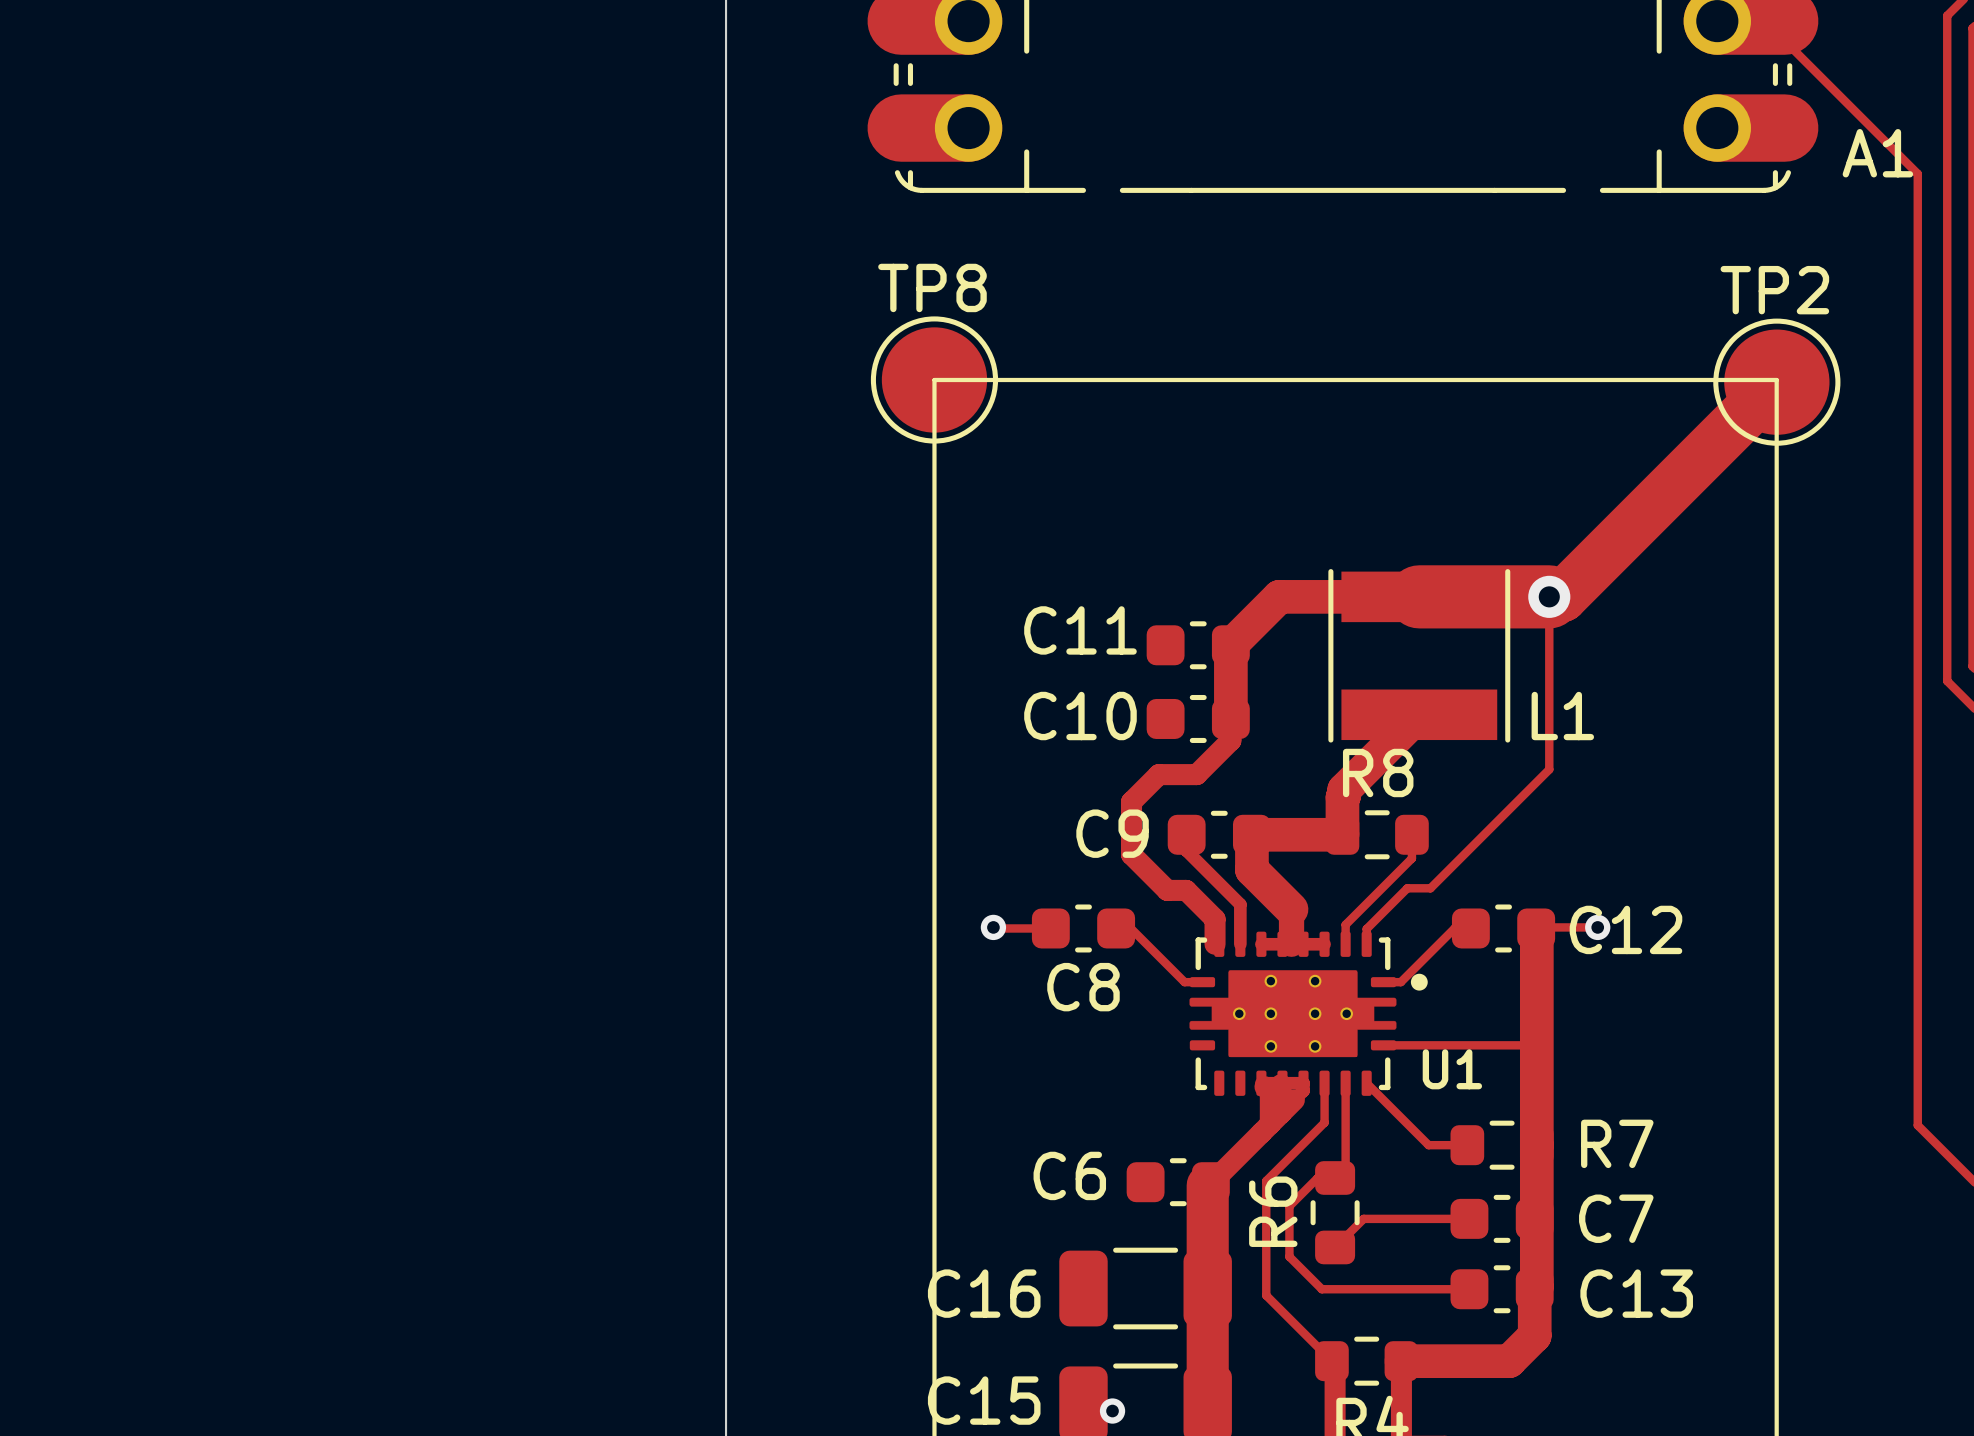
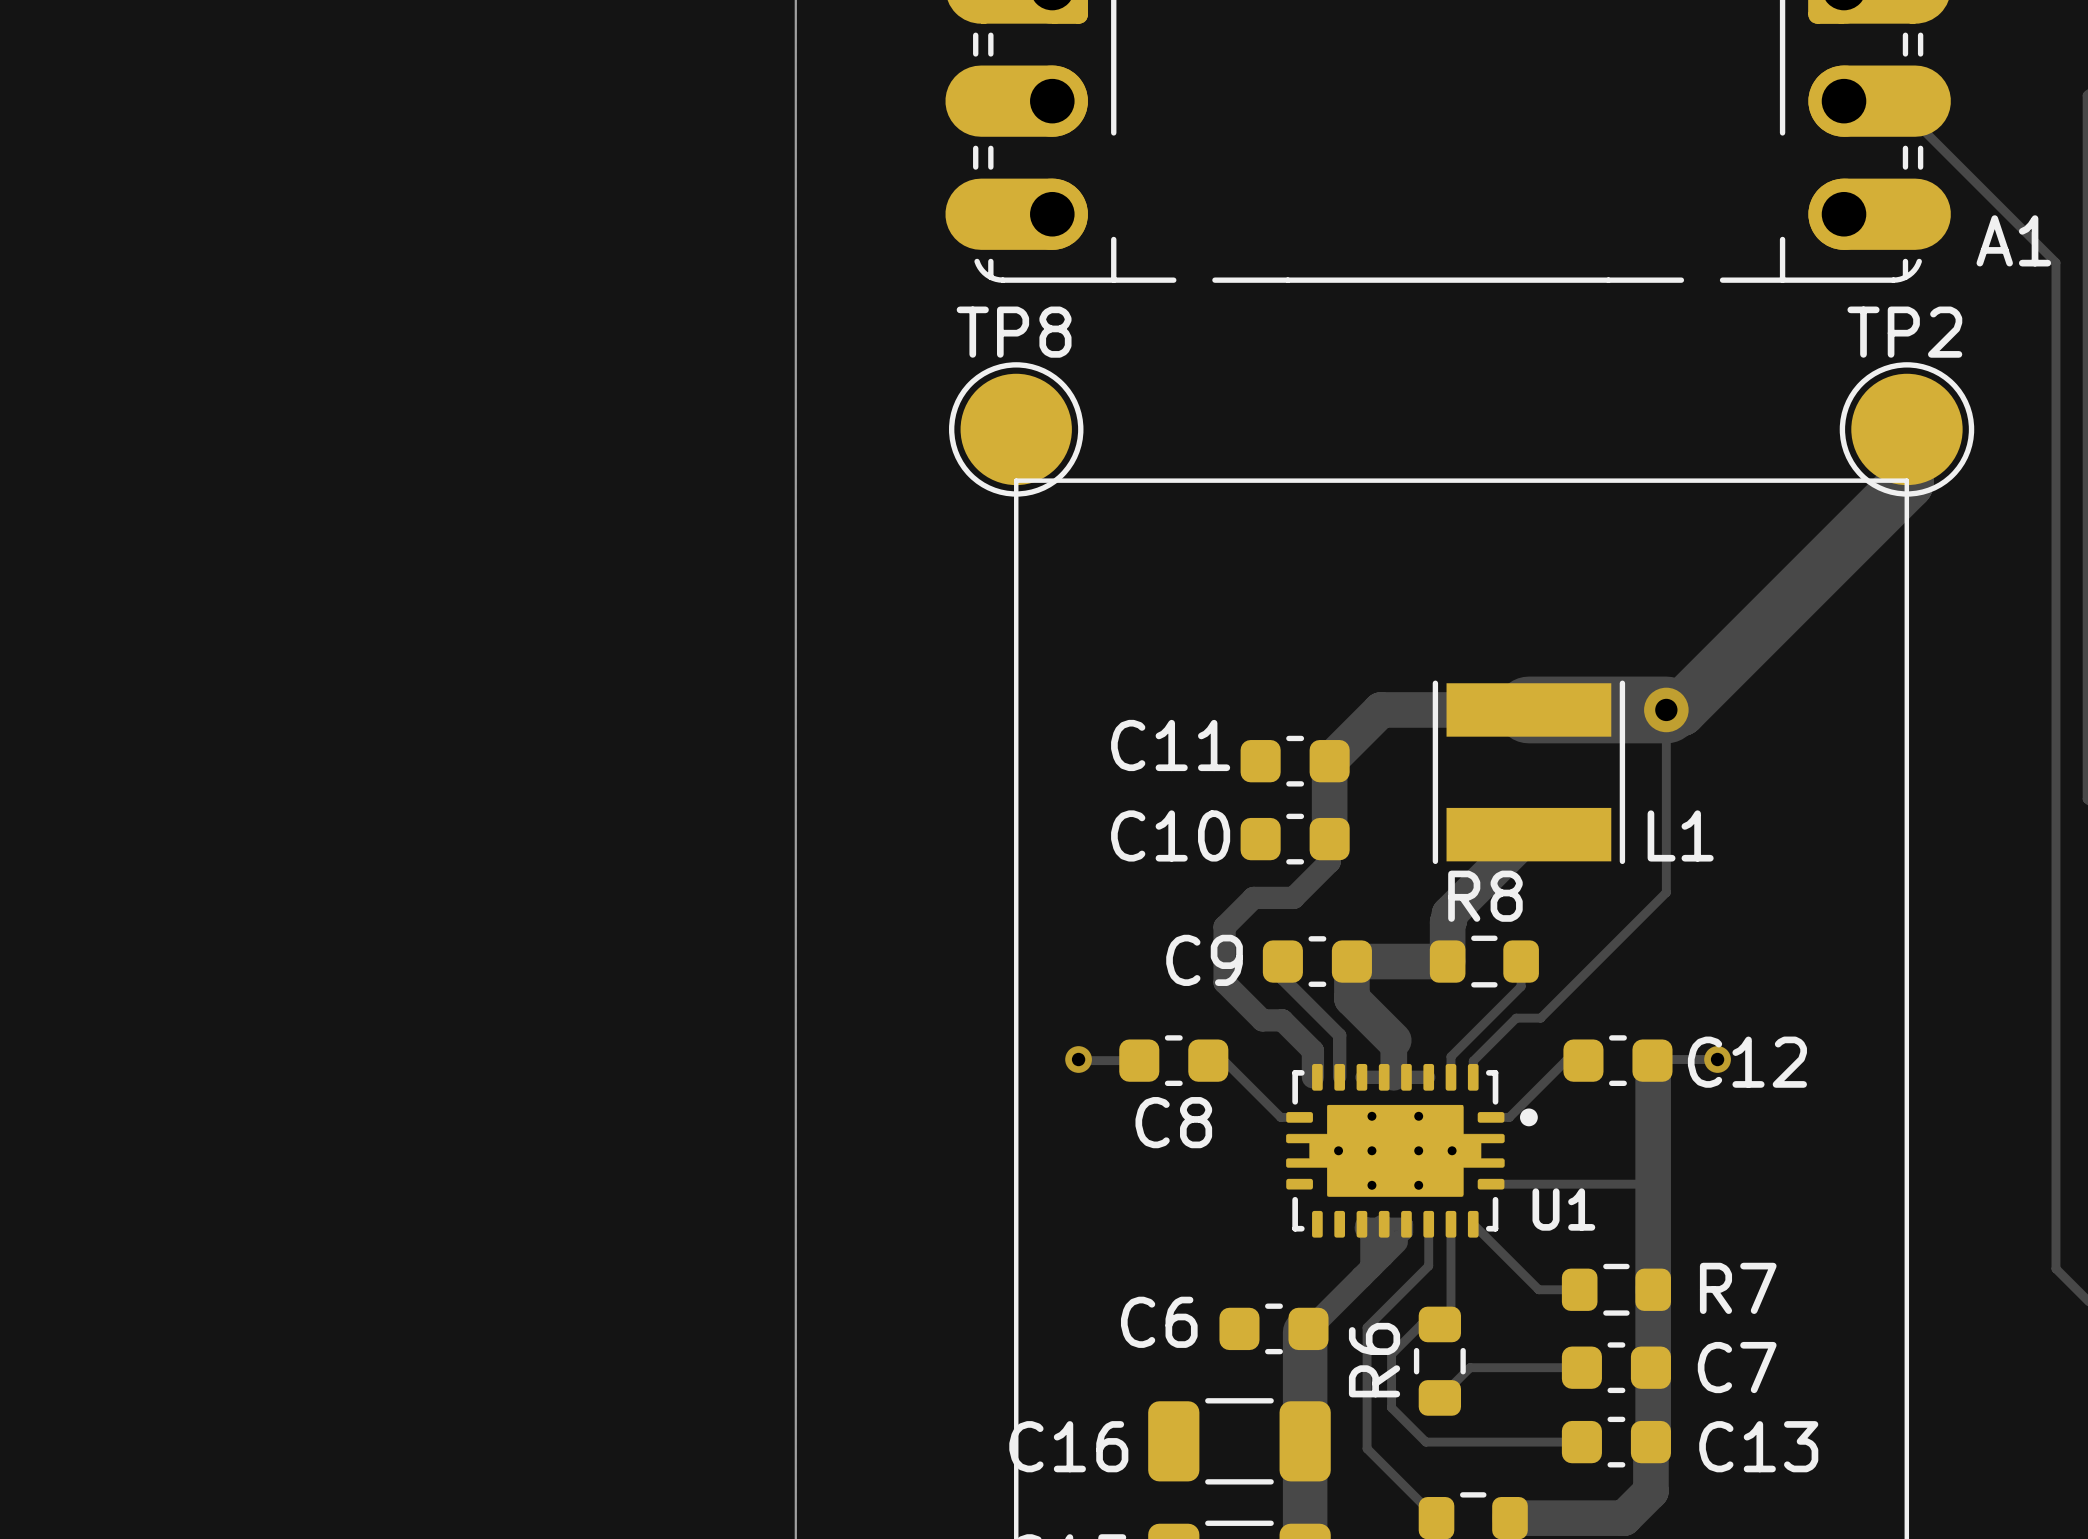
TP8 position: (934, 379) -> (1016, 429)
TP2 position: (1776, 382) -> (1906, 429)

